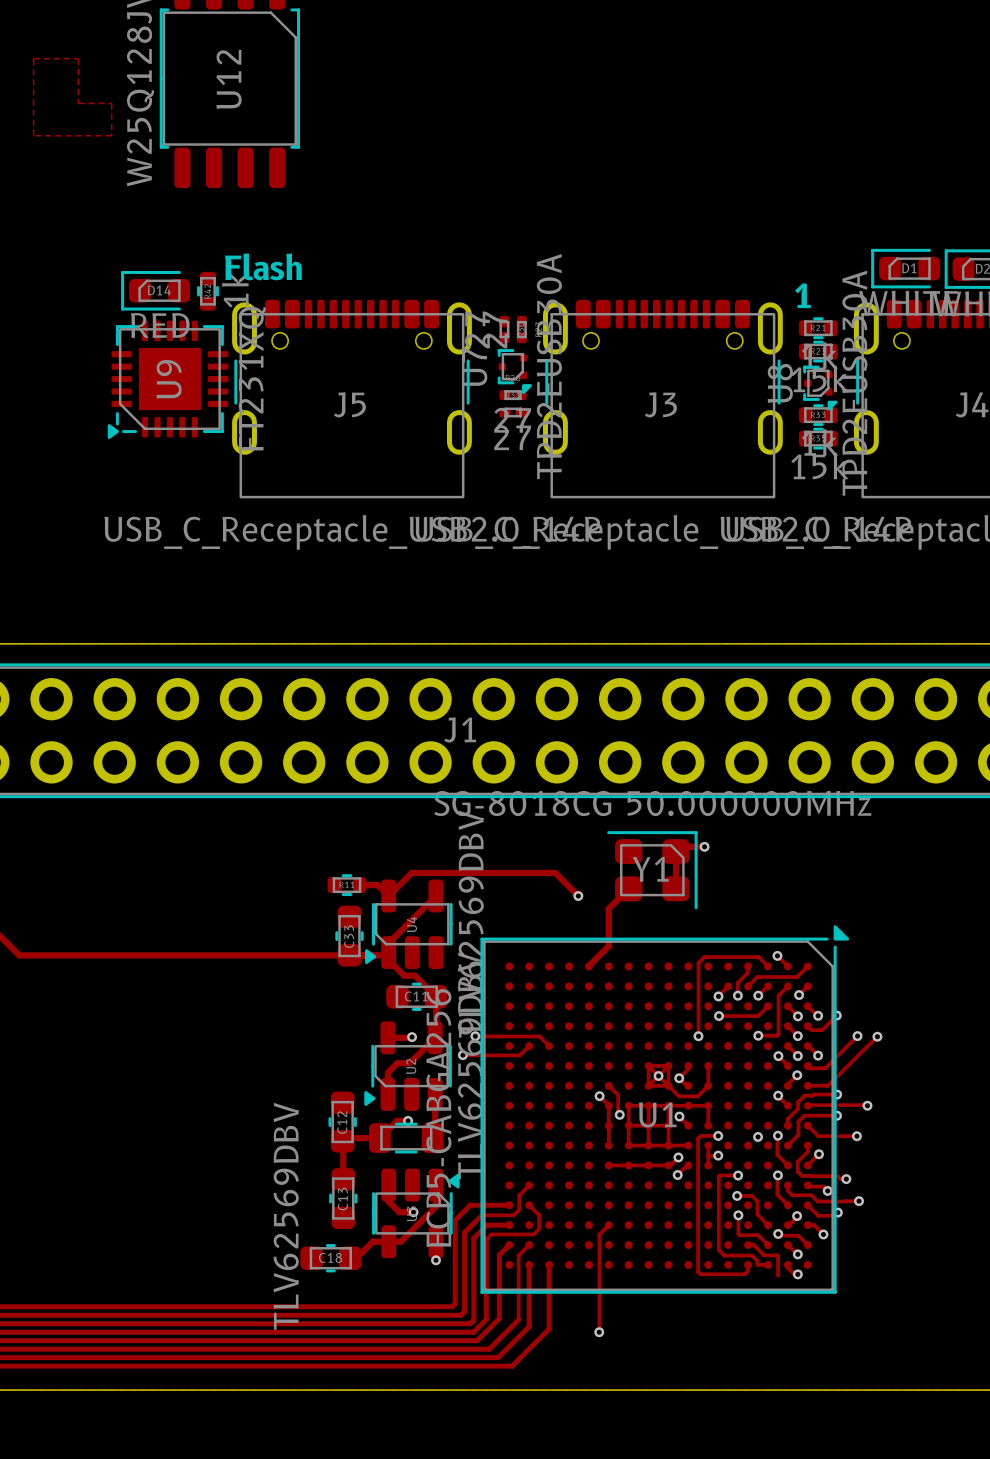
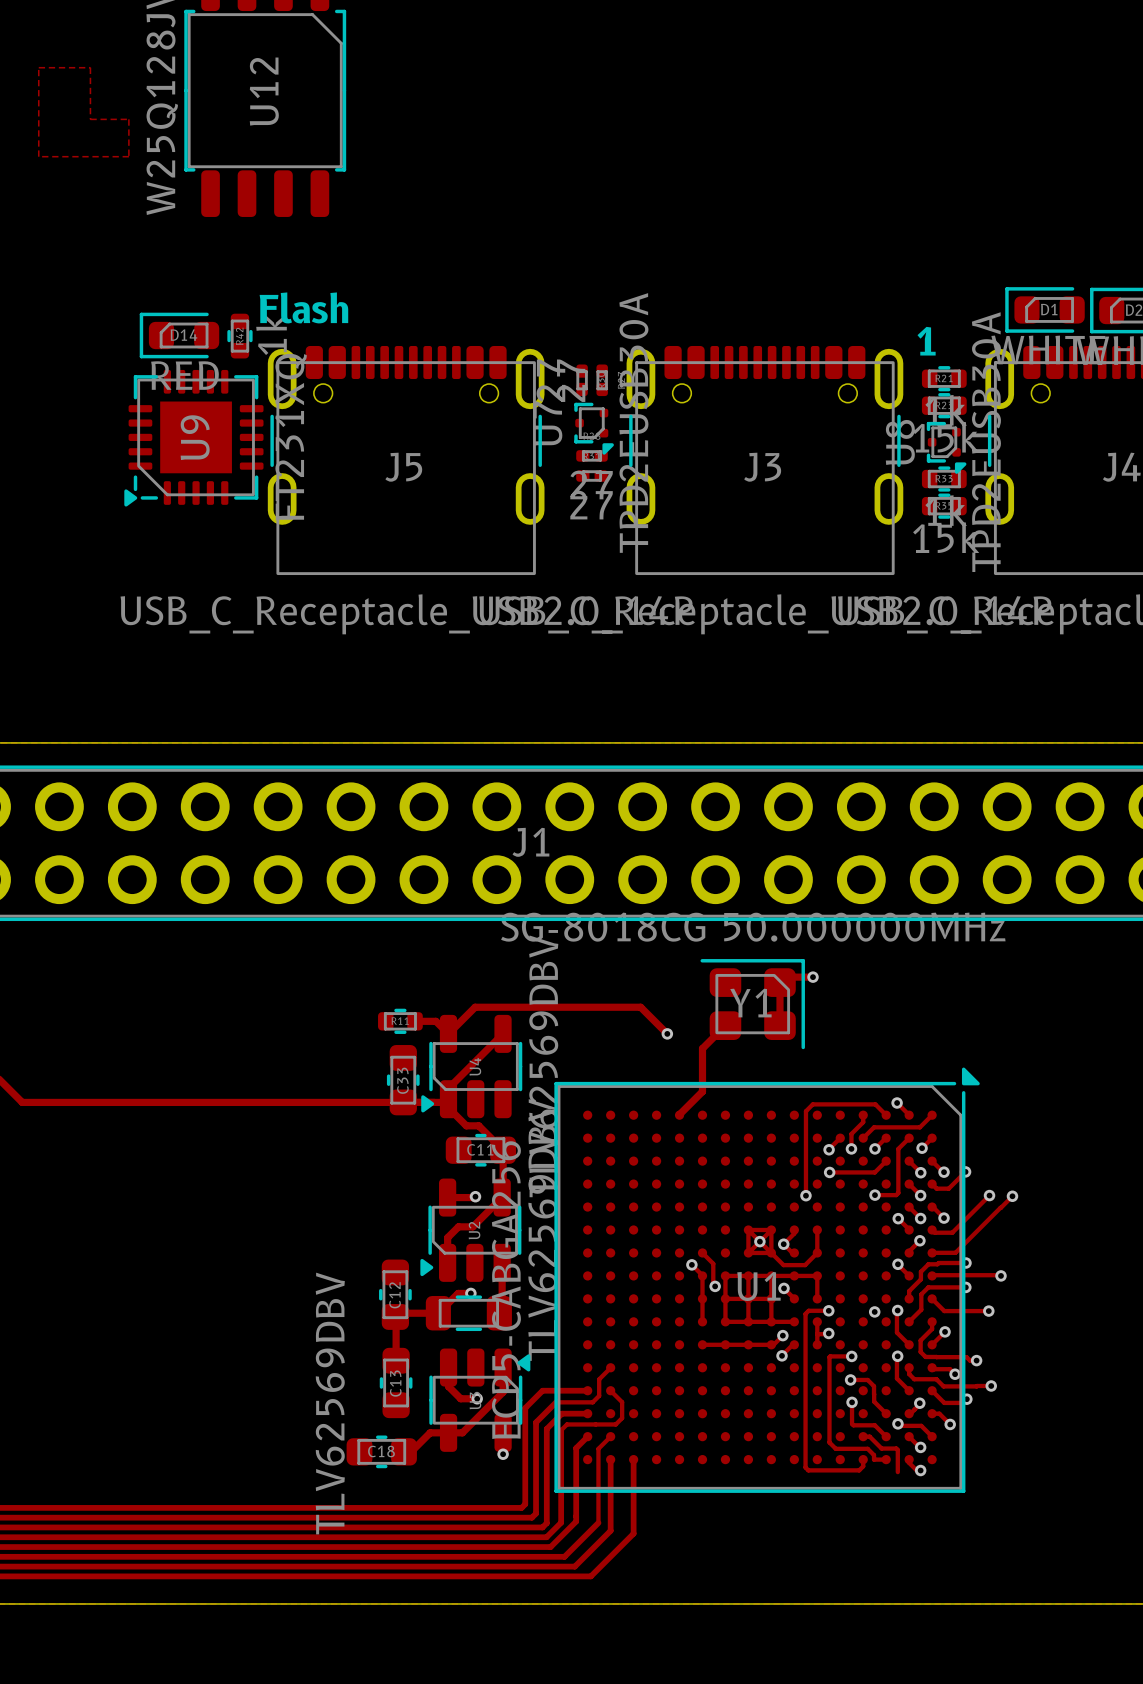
track: (475, 1036) (539, 1036) (549, 1046) -> none
via: (475, 1036) -> none
track: (529, 1046) (519, 1055) (463, 1055) -> none
via: (462, 1055) -> none
track: (608, 1225) (599, 1234) (599, 1331) -> none
via: (599, 1332) -> none

